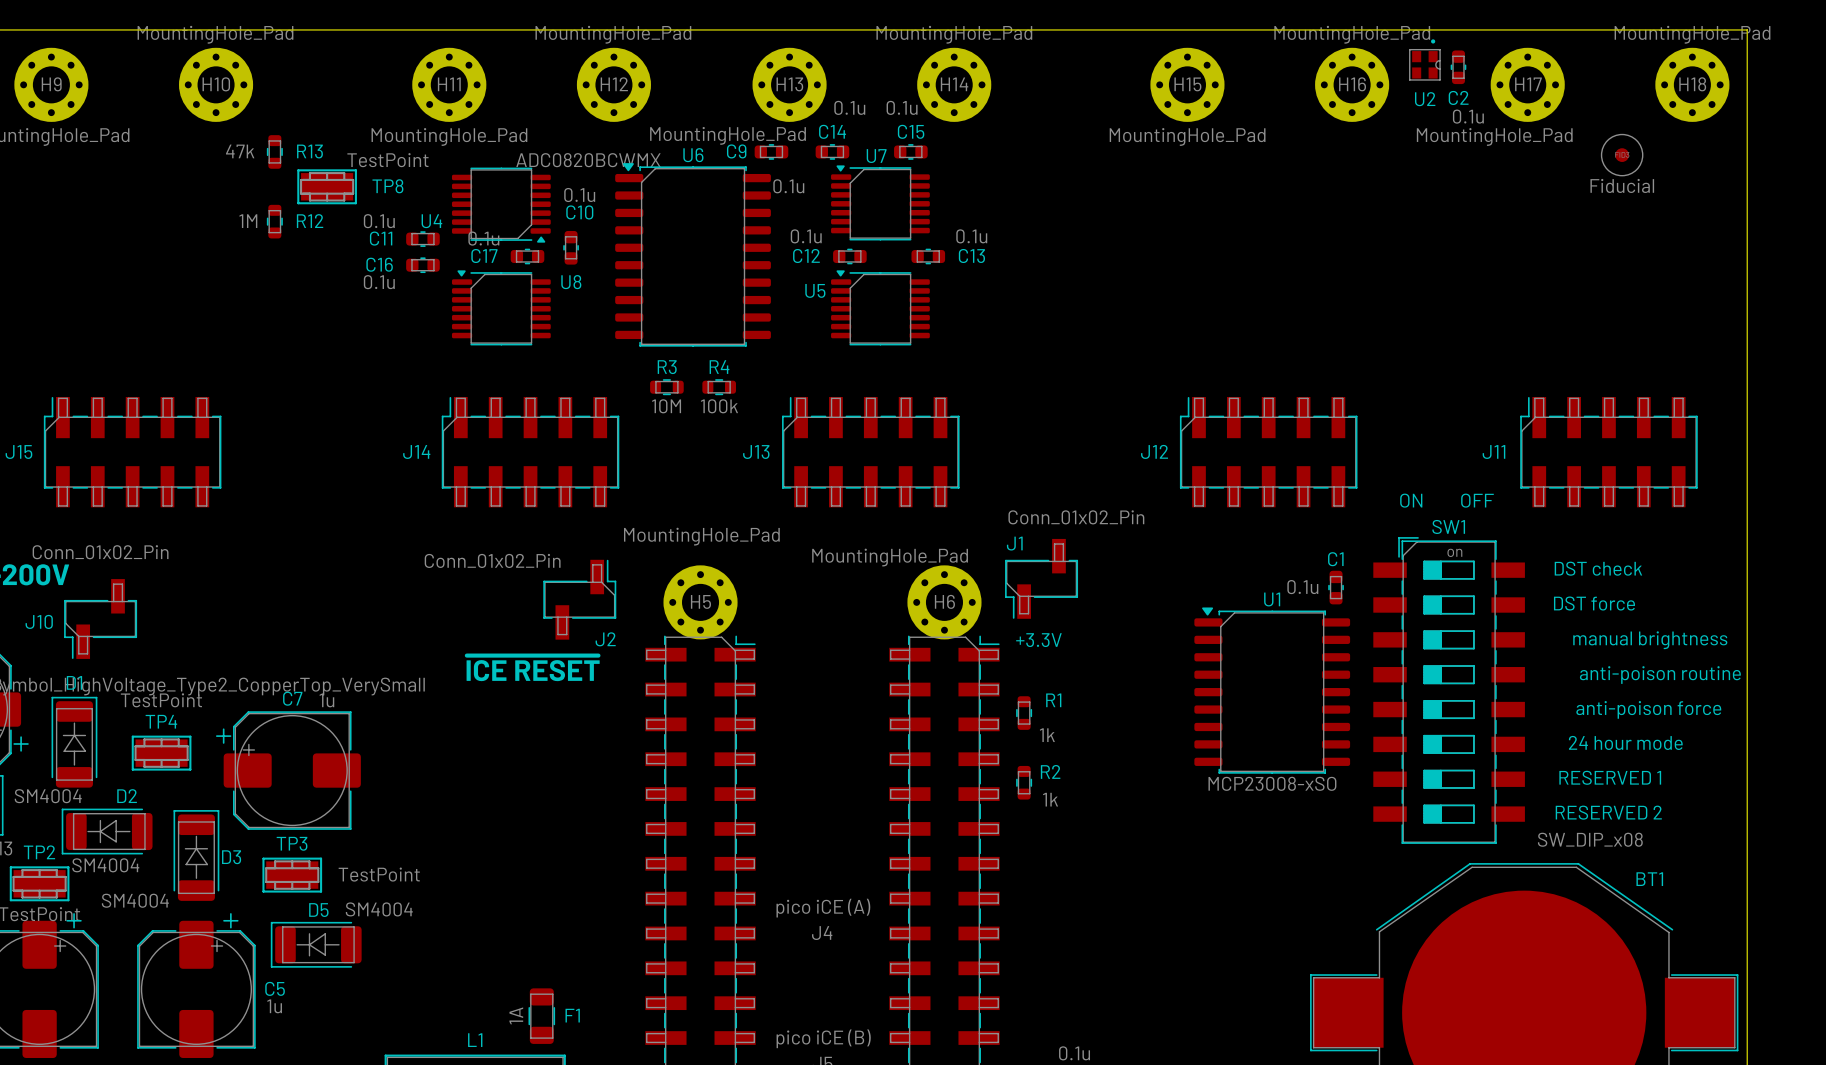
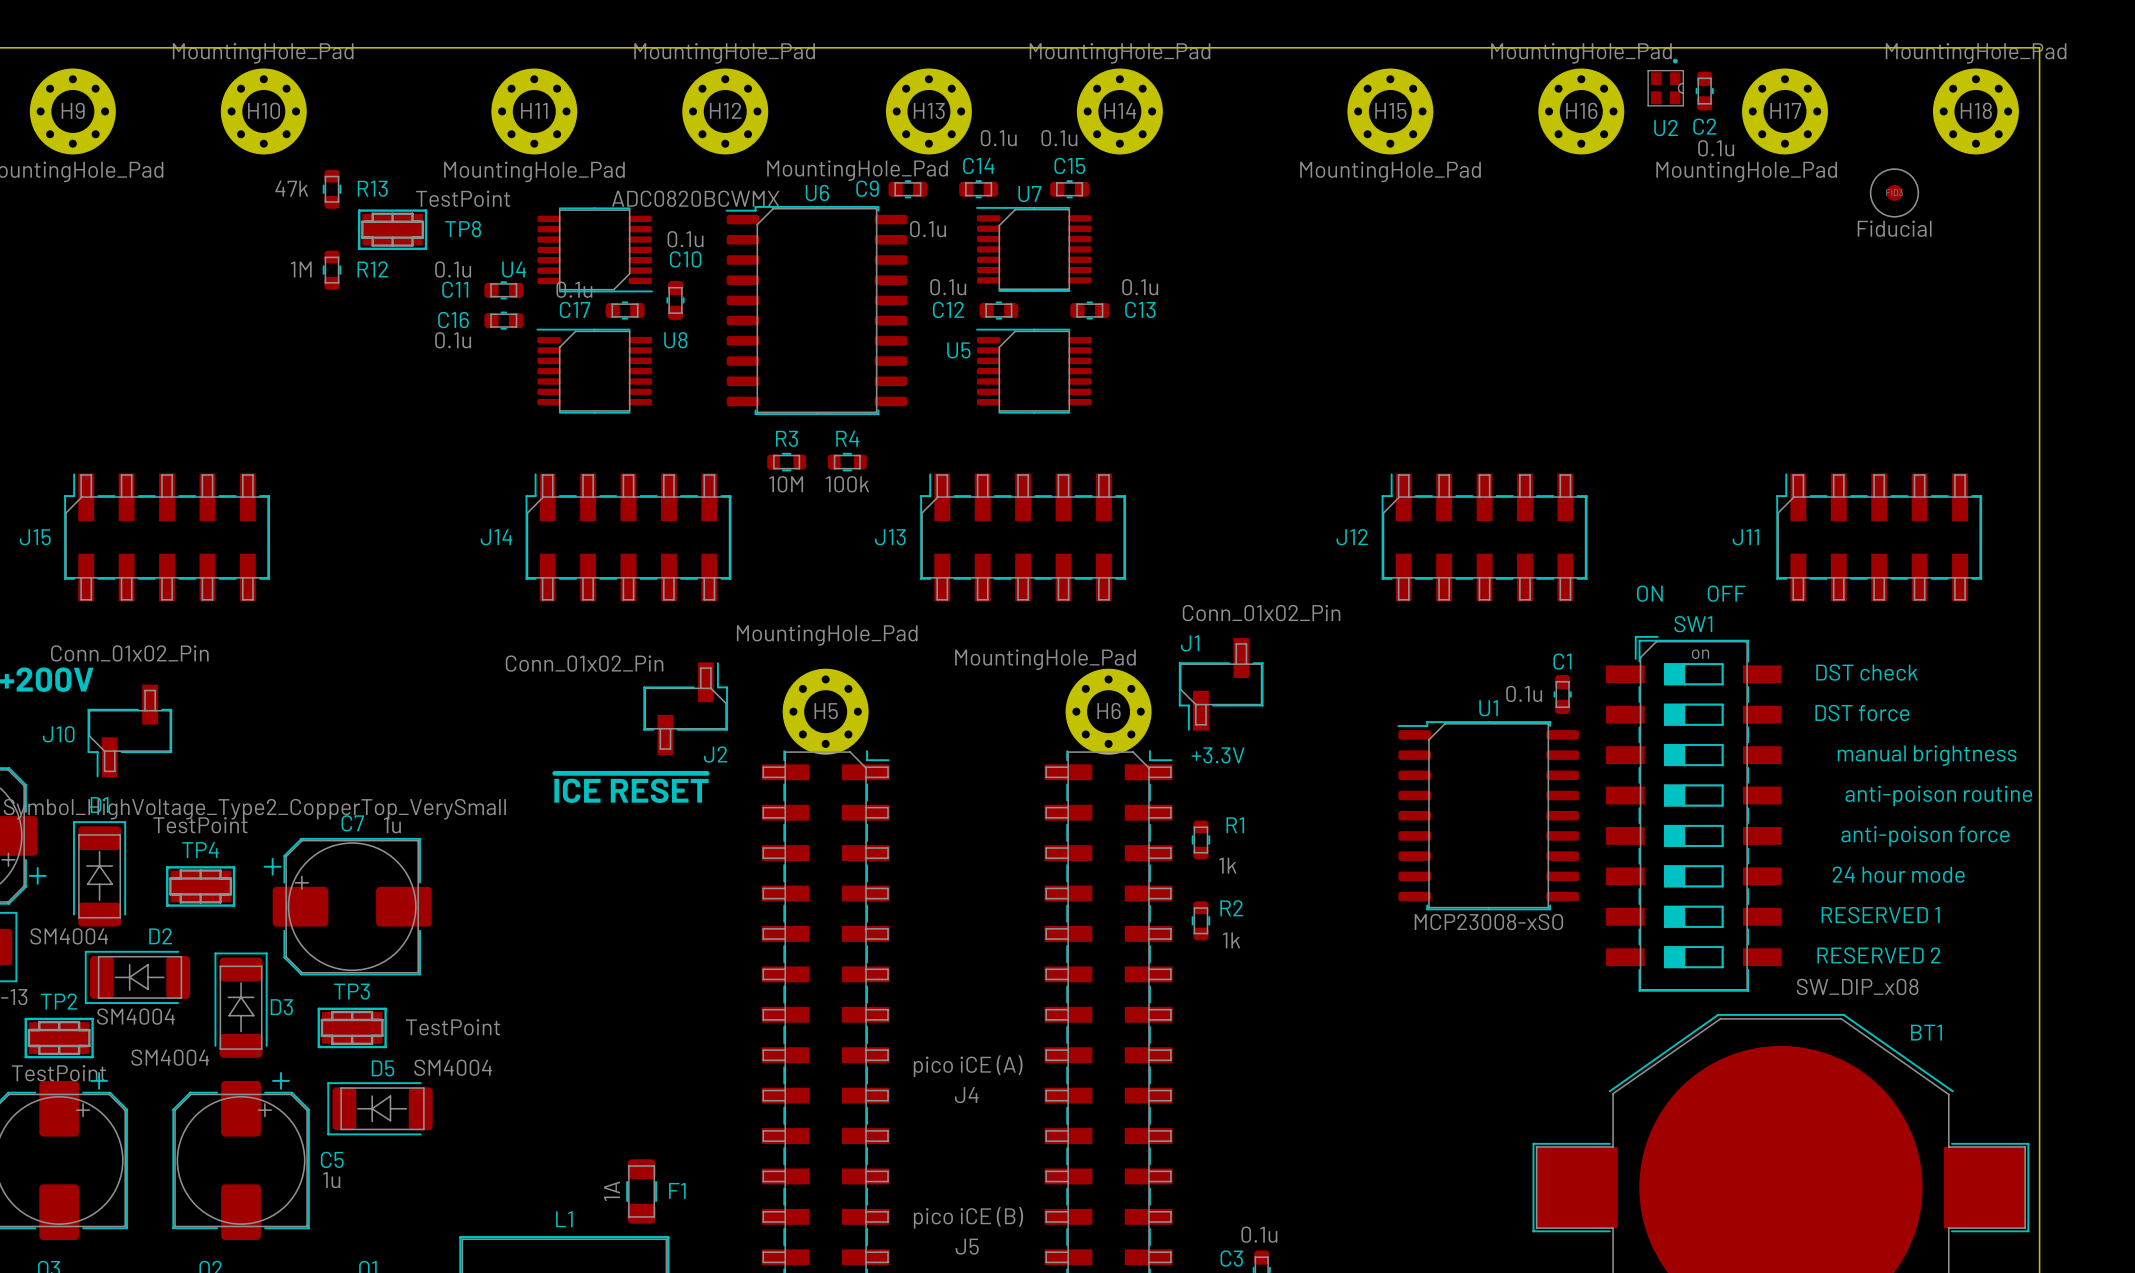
U6 footprint: [615, 163, 771, 347] -> [725, 205, 908, 416]
U7 footprint: [831, 165, 930, 241] -> [976, 206, 1092, 292]
U4 footprint: [451, 167, 551, 243] -> [537, 207, 653, 293]
U8 footprint: [451, 270, 551, 346] -> [536, 328, 652, 414]
U5 footprint: [831, 270, 930, 346] -> [976, 328, 1092, 414]
U1 footprint: [1194, 607, 1351, 774] -> [1397, 721, 1579, 911]

